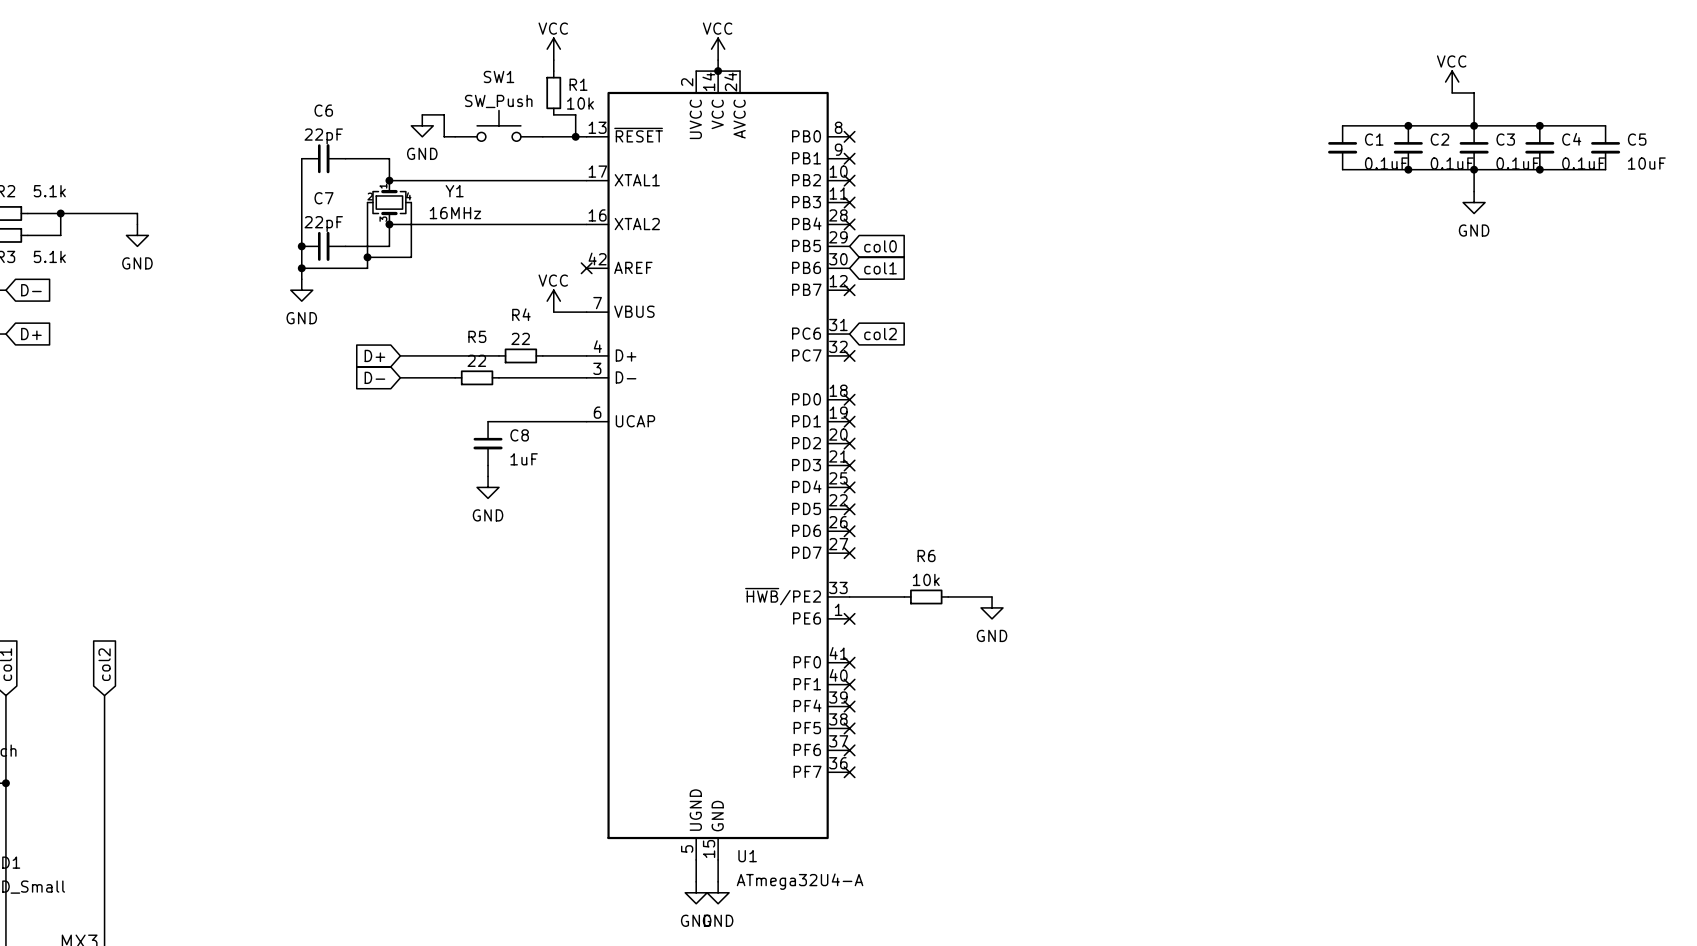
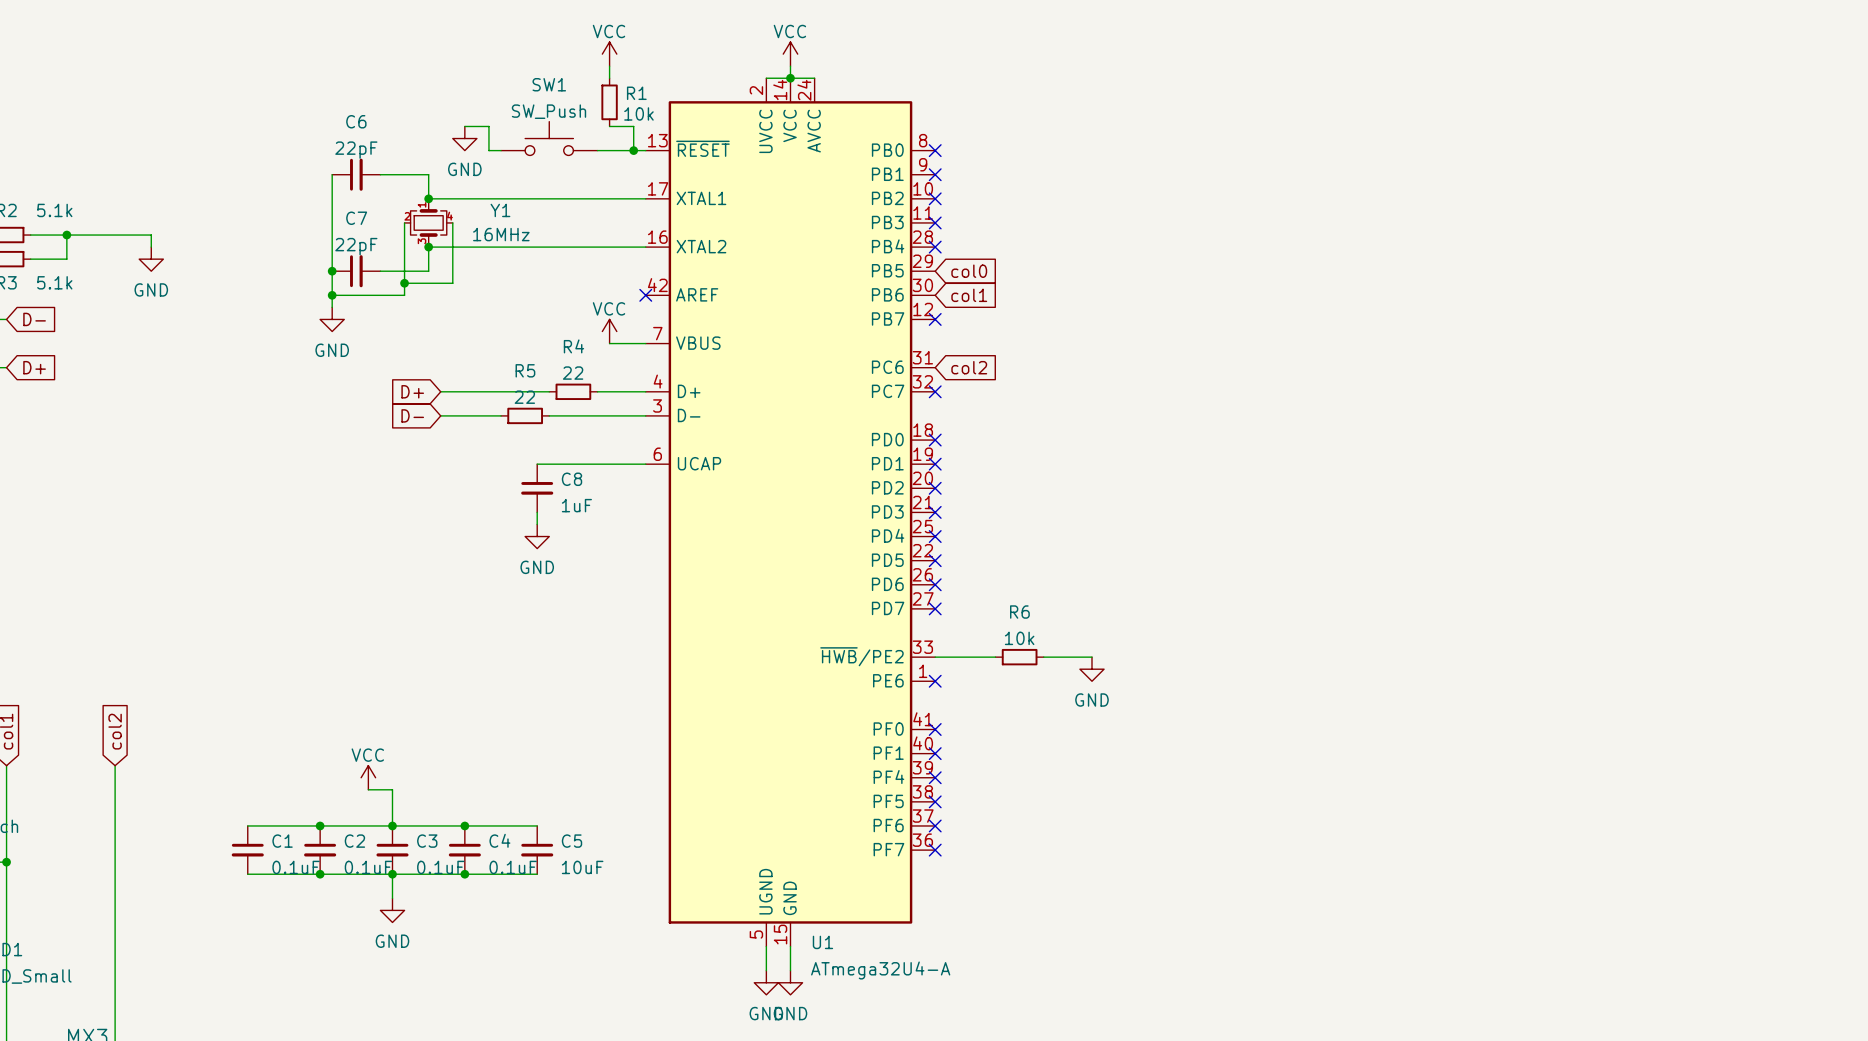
power symbol: VCC (1452, 82) -> none
wire: (1452, 92) (1474, 92) (1474, 125) -> none
wire: (1342, 125) (1605, 125) -> none
junction: (1408, 125) -> none
junction: (1474, 125) -> none
junction: (1539, 125) -> none
C1 position: (1342, 147) -> (247, 850)
C2 position: (1408, 147) -> (320, 850)
C3 position: (1474, 147) -> (392, 850)
C4 position: (1539, 147) -> (464, 850)
C5 position: (1605, 147) -> (537, 850)
wire: (1342, 169) (1605, 169) -> none
junction: (1408, 169) -> none
wire: (1474, 169) (1474, 191) -> none
junction: (1474, 169) -> none
junction: (1539, 169) -> none
power symbol: GND (1474, 202) -> none
power symbol: none -> VCC (368, 777)
wire: none -> (368, 789) (392, 789) (392, 825)
wire: none -> (247, 825) (537, 825)
junction: none -> (320, 825)
junction: none -> (392, 825)
junction: none -> (464, 825)
wire: none -> (247, 874) (537, 874)
junction: none -> (320, 874)
wire: none -> (392, 874) (392, 898)
junction: none -> (392, 874)
junction: none -> (464, 874)
power symbol: none -> GND (392, 910)

